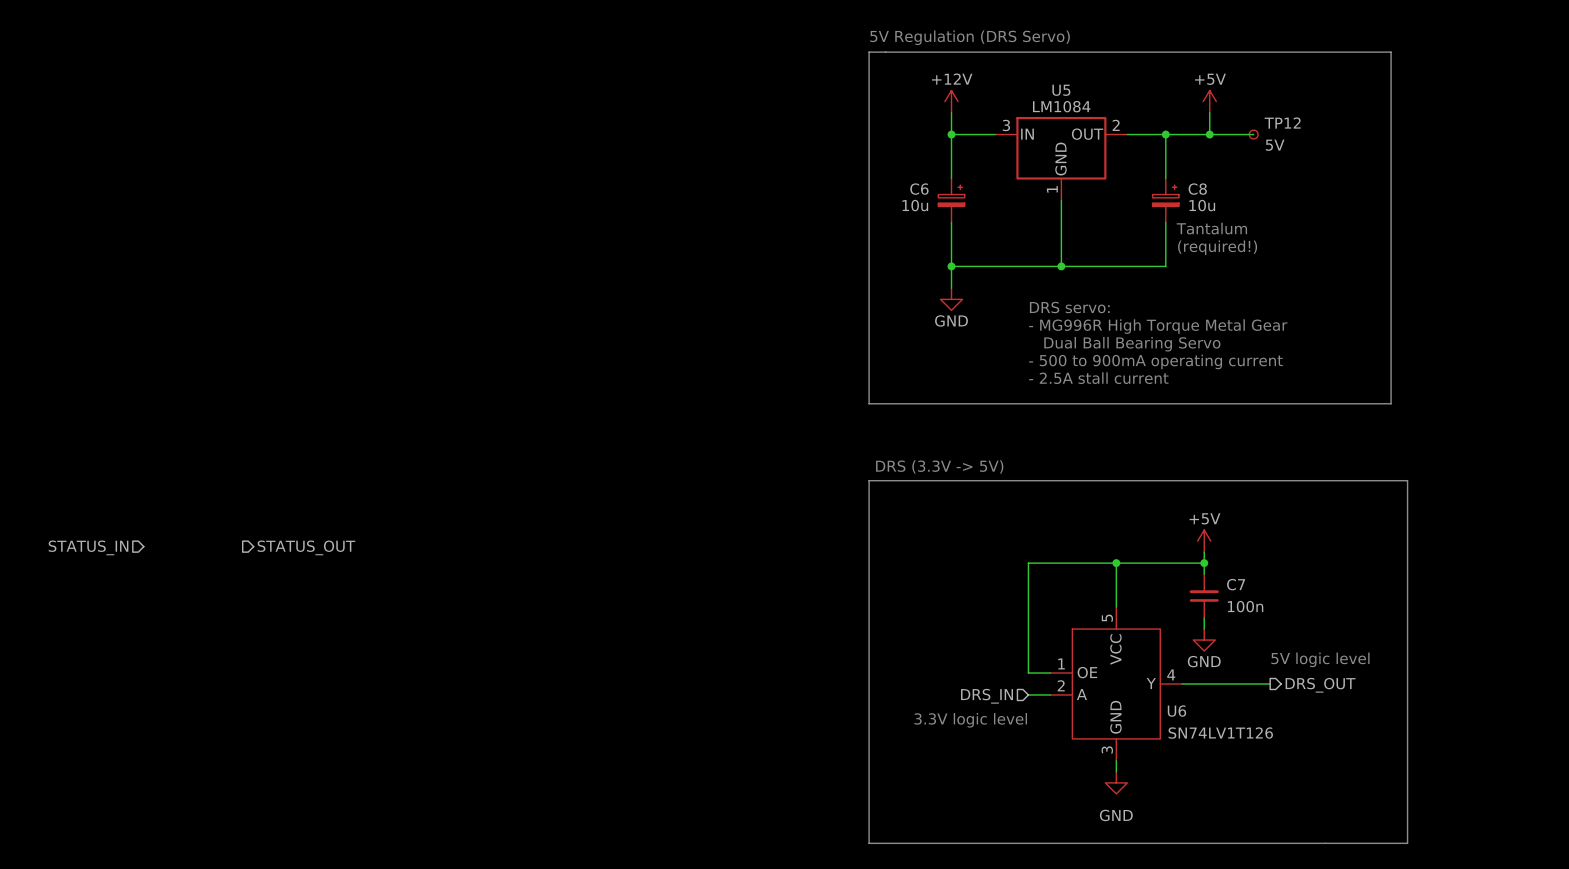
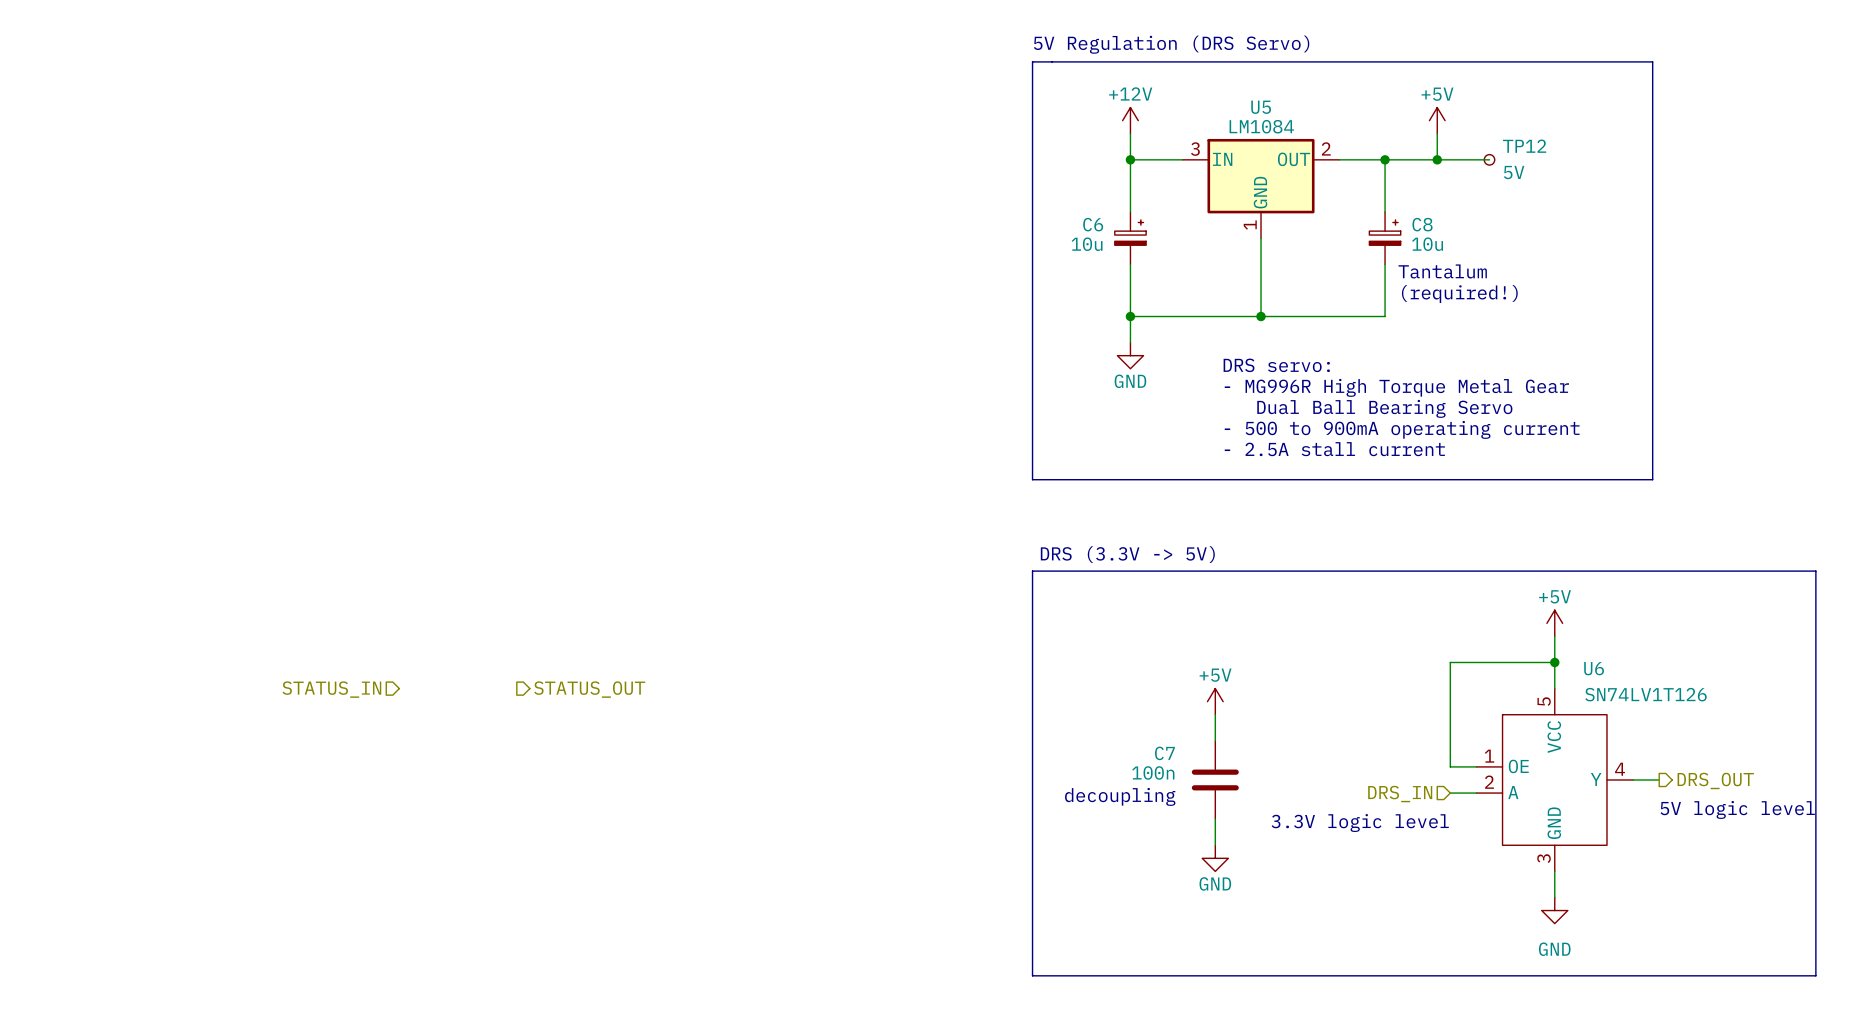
line: (1407, 480) (1407, 843) (869, 843) (869, 821) -> (1672, 571) (1815, 571) (1815, 975) (1032, 975)
power symbol: none -> +5V (1554, 623)
power symbol: +5V (1204, 541) -> none
hierarchical label position: STATUS_IN (88, 547) -> STATUS_IN (331, 689)
hierarchical label position: STATUS_OUT (306, 547) -> STATUS_OUT (589, 689)
wire: (1204, 552) (1204, 574) -> (1215, 714) (1215, 740)
wire: none -> (1554, 662) (1450, 662) (1450, 766) (1476, 766)
junction: none -> (1554, 662)
wire: (1116, 563) (1116, 607) -> (1554, 636) (1554, 688)
junction: (1116, 563) -> none
wire: (1204, 563) (1028, 563) (1028, 673) (1050, 673) -> none
junction: (1204, 563) -> none
C7 symbol: [1189, 574, 1219, 619] -> [1191, 740, 1239, 820]
C7 name position: C7 (1236, 584) -> C7 (1164, 753)
power symbol: none -> +5V (1215, 701)
C7 value position: 100n (1245, 606) -> 100n (1153, 772)
wire: (1204, 618) (1204, 629) -> none
power symbol: GND (1204, 640) -> none
wire: none -> (1633, 779) (1659, 779)
text position: 5V logic level (1320, 659) -> 5V logic level (1737, 809)
text: none -> decoupling (1120, 796)
U6 position: (1116, 683) -> (1554, 779)
wire: (1182, 683) (1270, 683) -> none
hierarchical label position: DRS_OUT (1320, 685) -> DRS_OUT (1715, 780)
wire: none -> (1215, 819) (1215, 845)
wire: (1028, 694) (1050, 694) -> (1450, 793) (1476, 793)
hierarchical label position: DRS_IN (987, 696) -> DRS_IN (1400, 794)
U6 name position: U6 (1176, 711) -> U6 (1594, 668)
text position: 3.3V logic level (970, 720) -> 3.3V logic level (1360, 823)
power symbol: none -> GND (1215, 858)
U6 value position: SN74LV1T126 (1220, 733) -> SN74LV1T126 (1645, 694)
wire: none -> (1554, 871) (1554, 897)
wire: (1116, 760) (1116, 771) -> none
power symbol: none -> GND (1554, 910)
power symbol: GND (1116, 782) -> none

